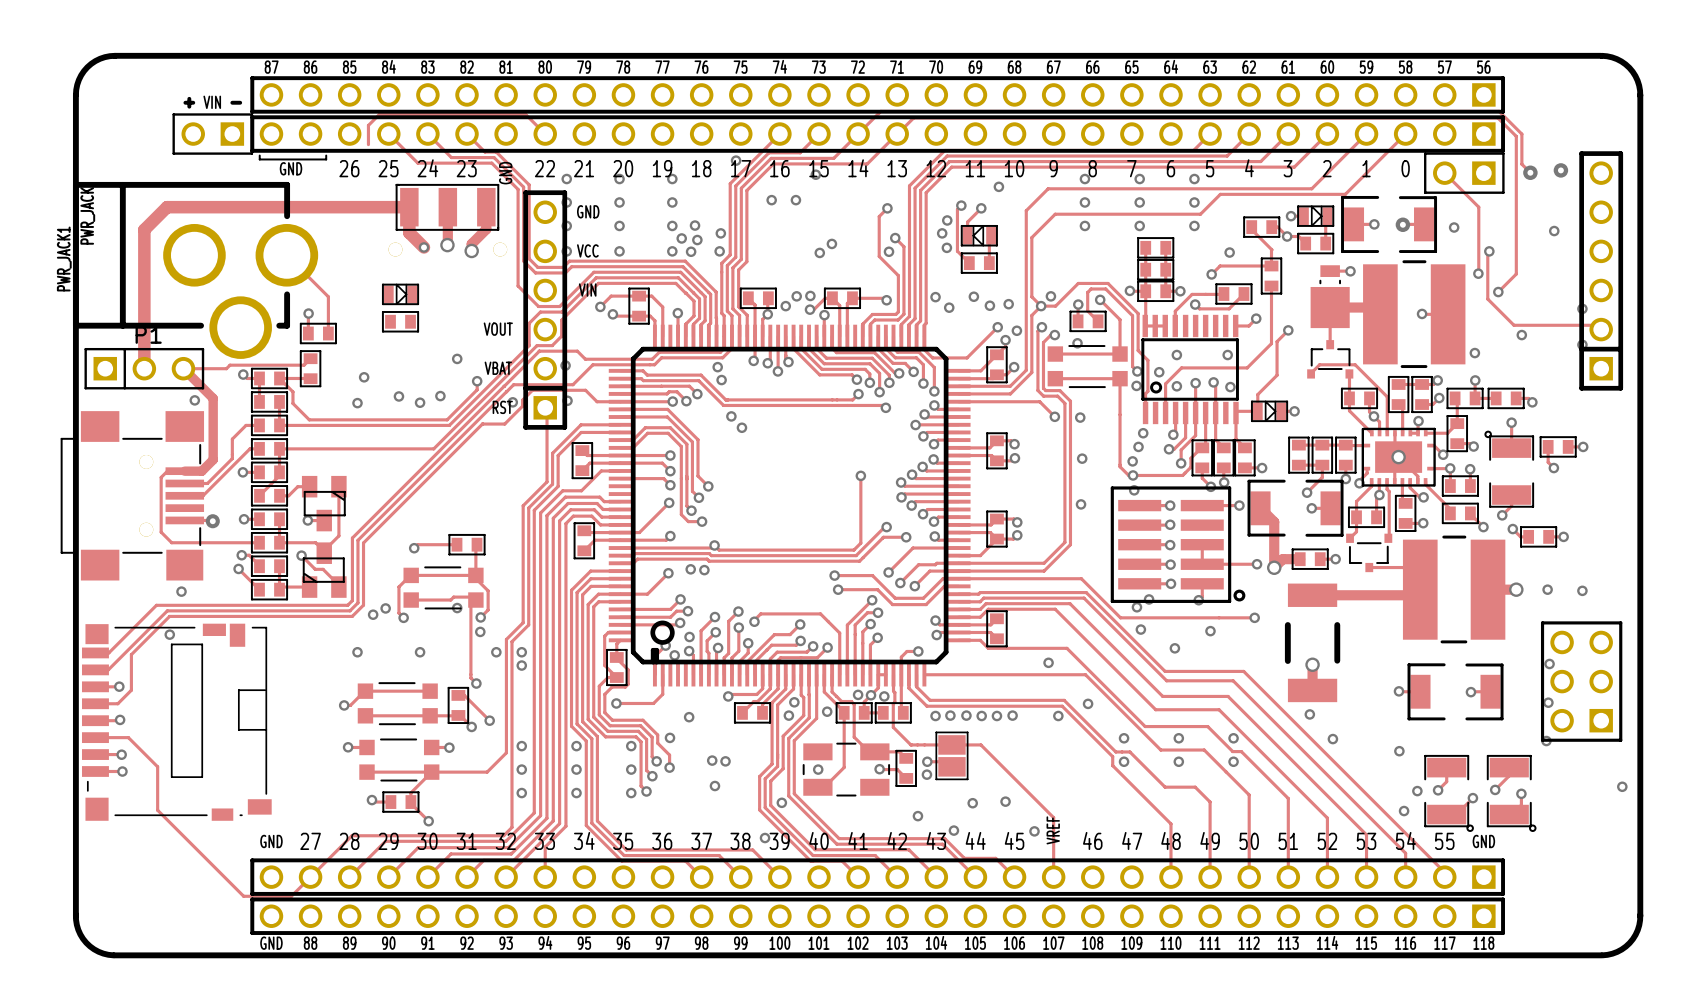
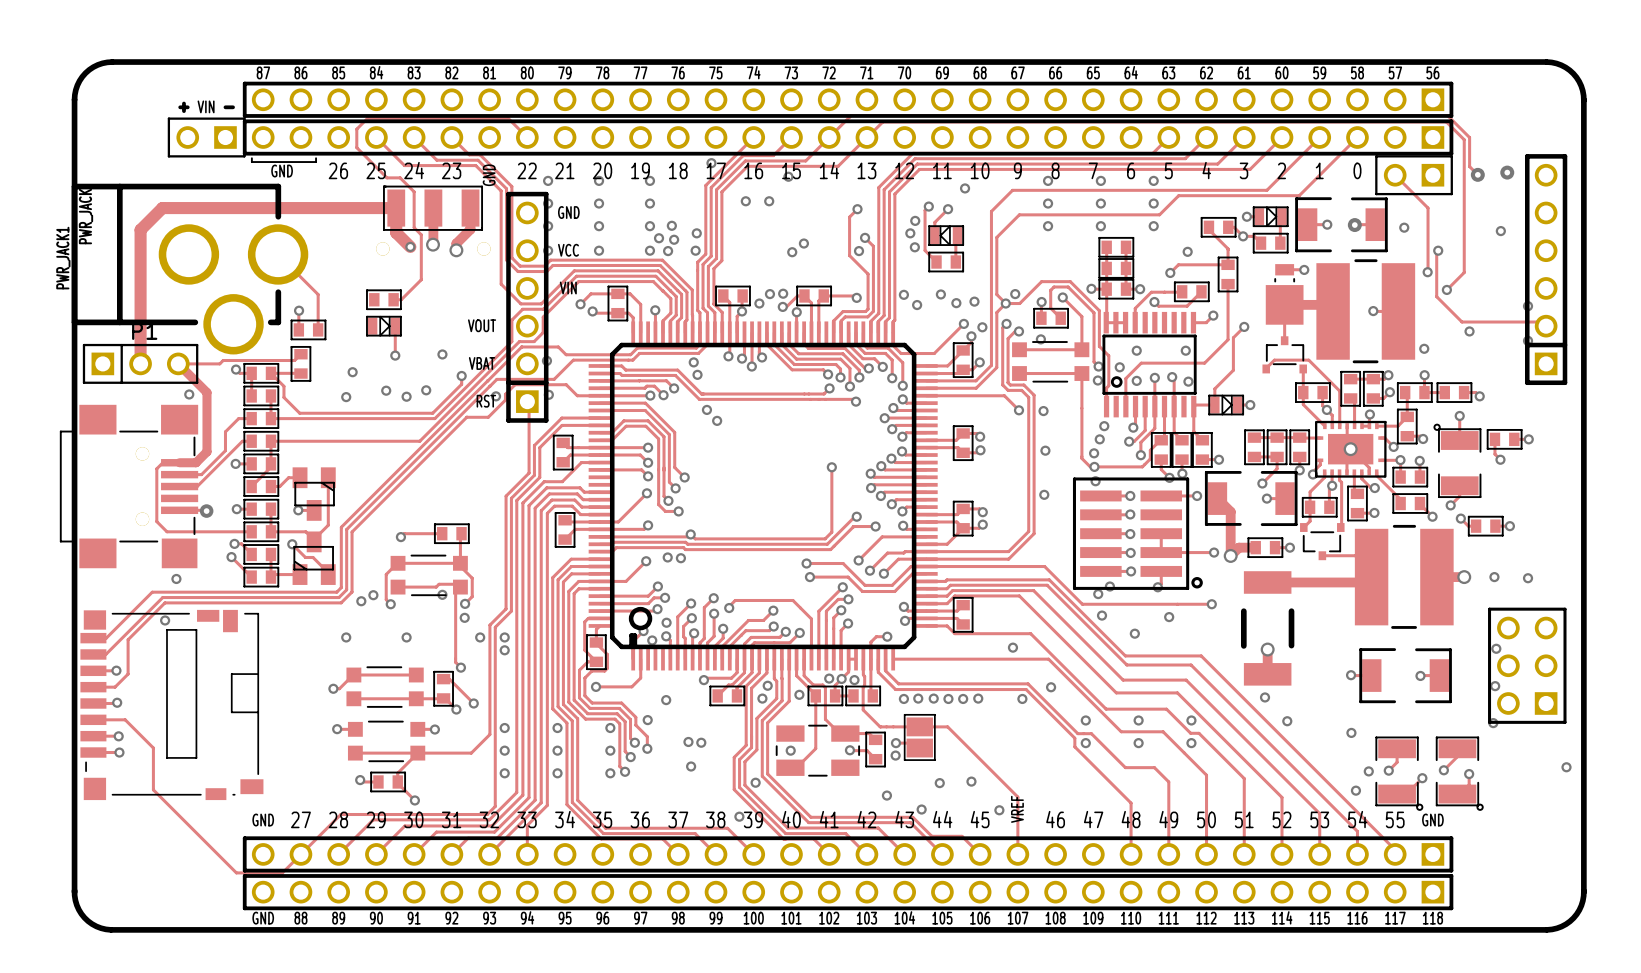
track: none -> (356, 147) (386, 177) (400, 177) (414, 191) (414, 227) (421, 234) (421, 279) (401, 299) (393, 299)
part footprint: [381, 283, 420, 306] -> [366, 289, 402, 311]
part footprint: [381, 311, 420, 333] -> [366, 315, 402, 337]
track: none -> (395, 326) (395, 355)
via: none -> (395, 355)

